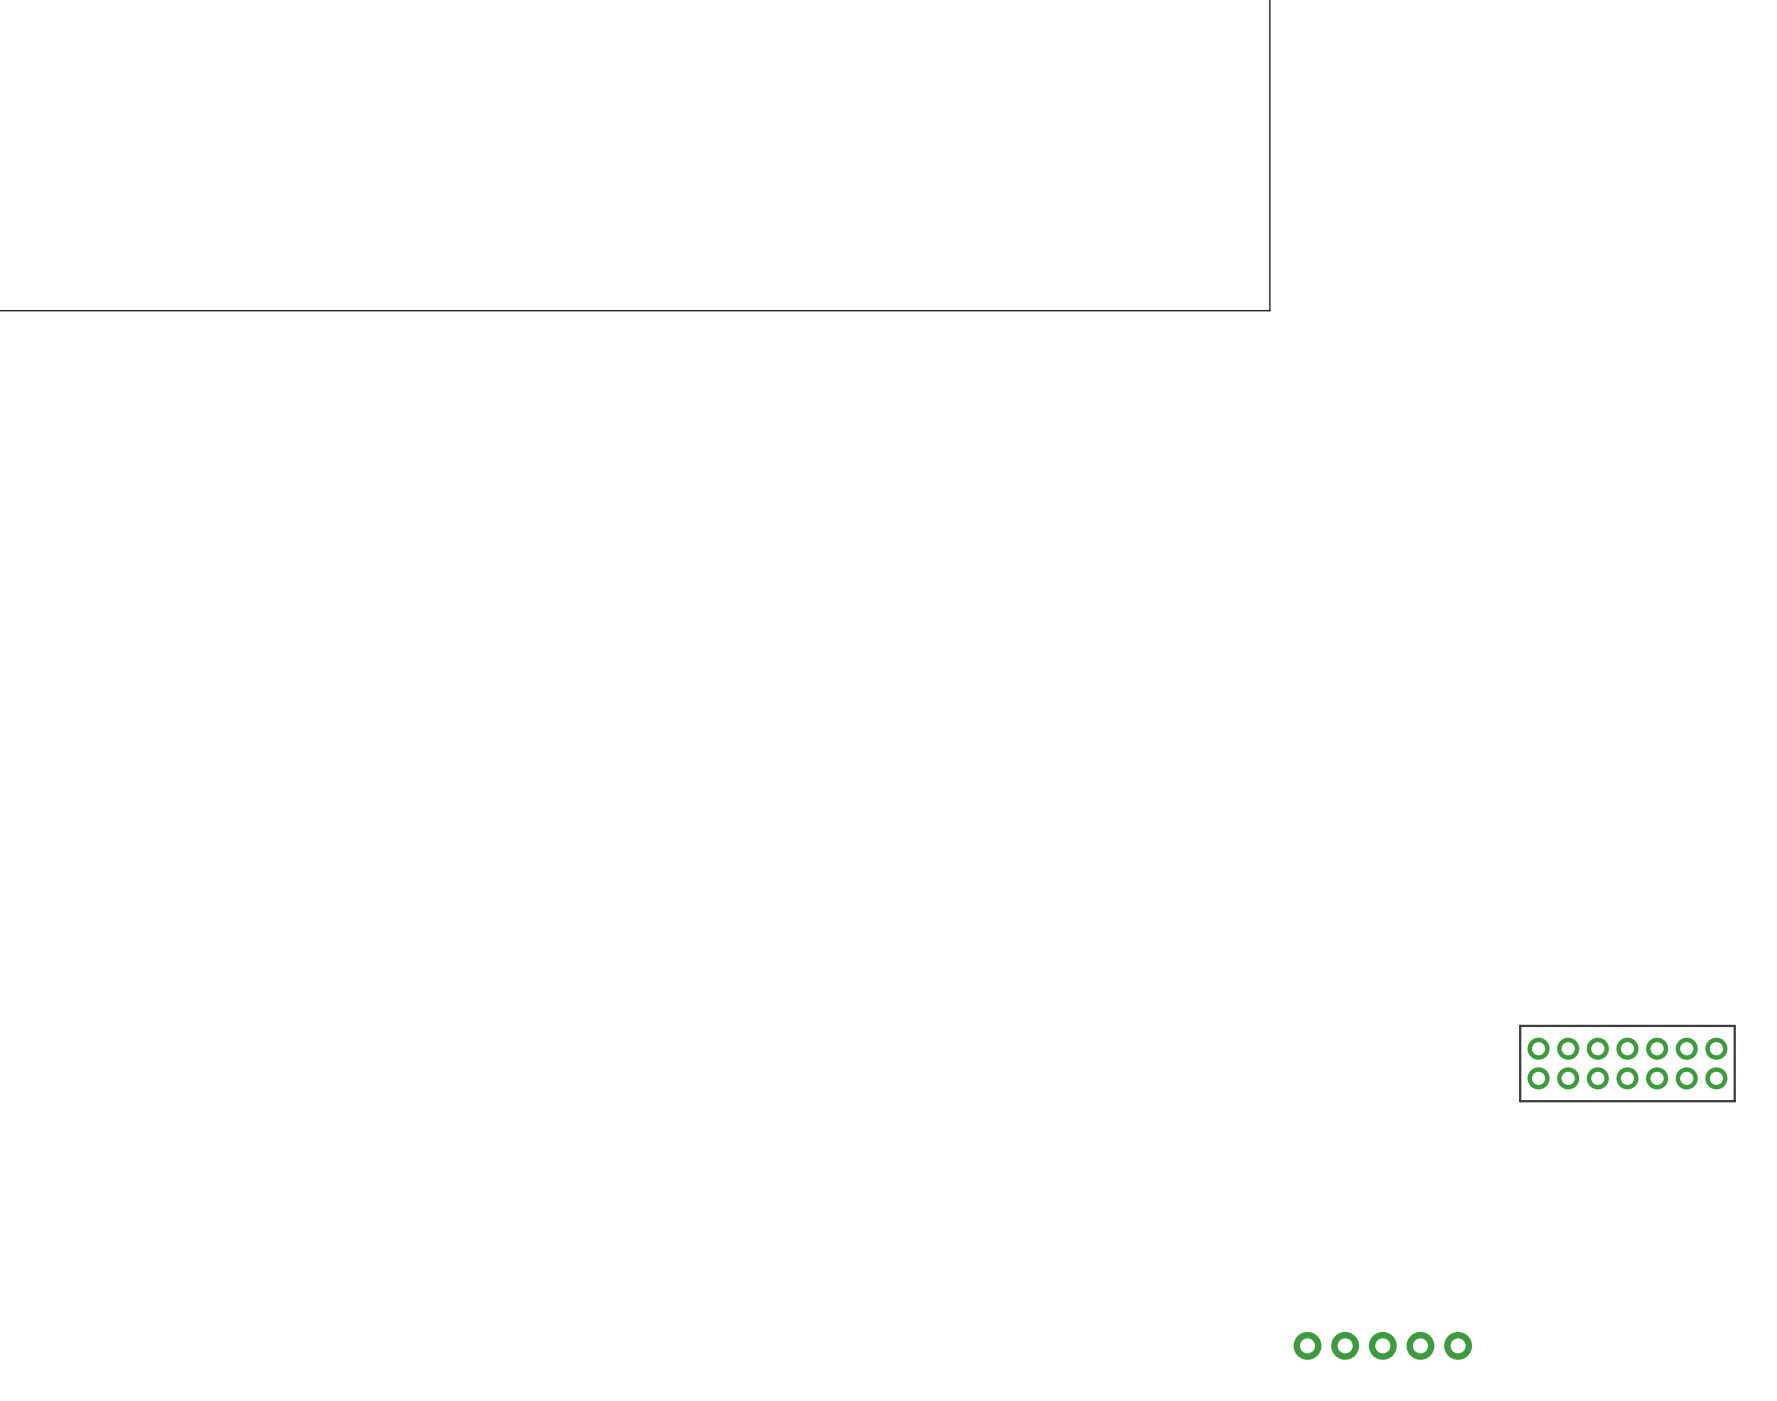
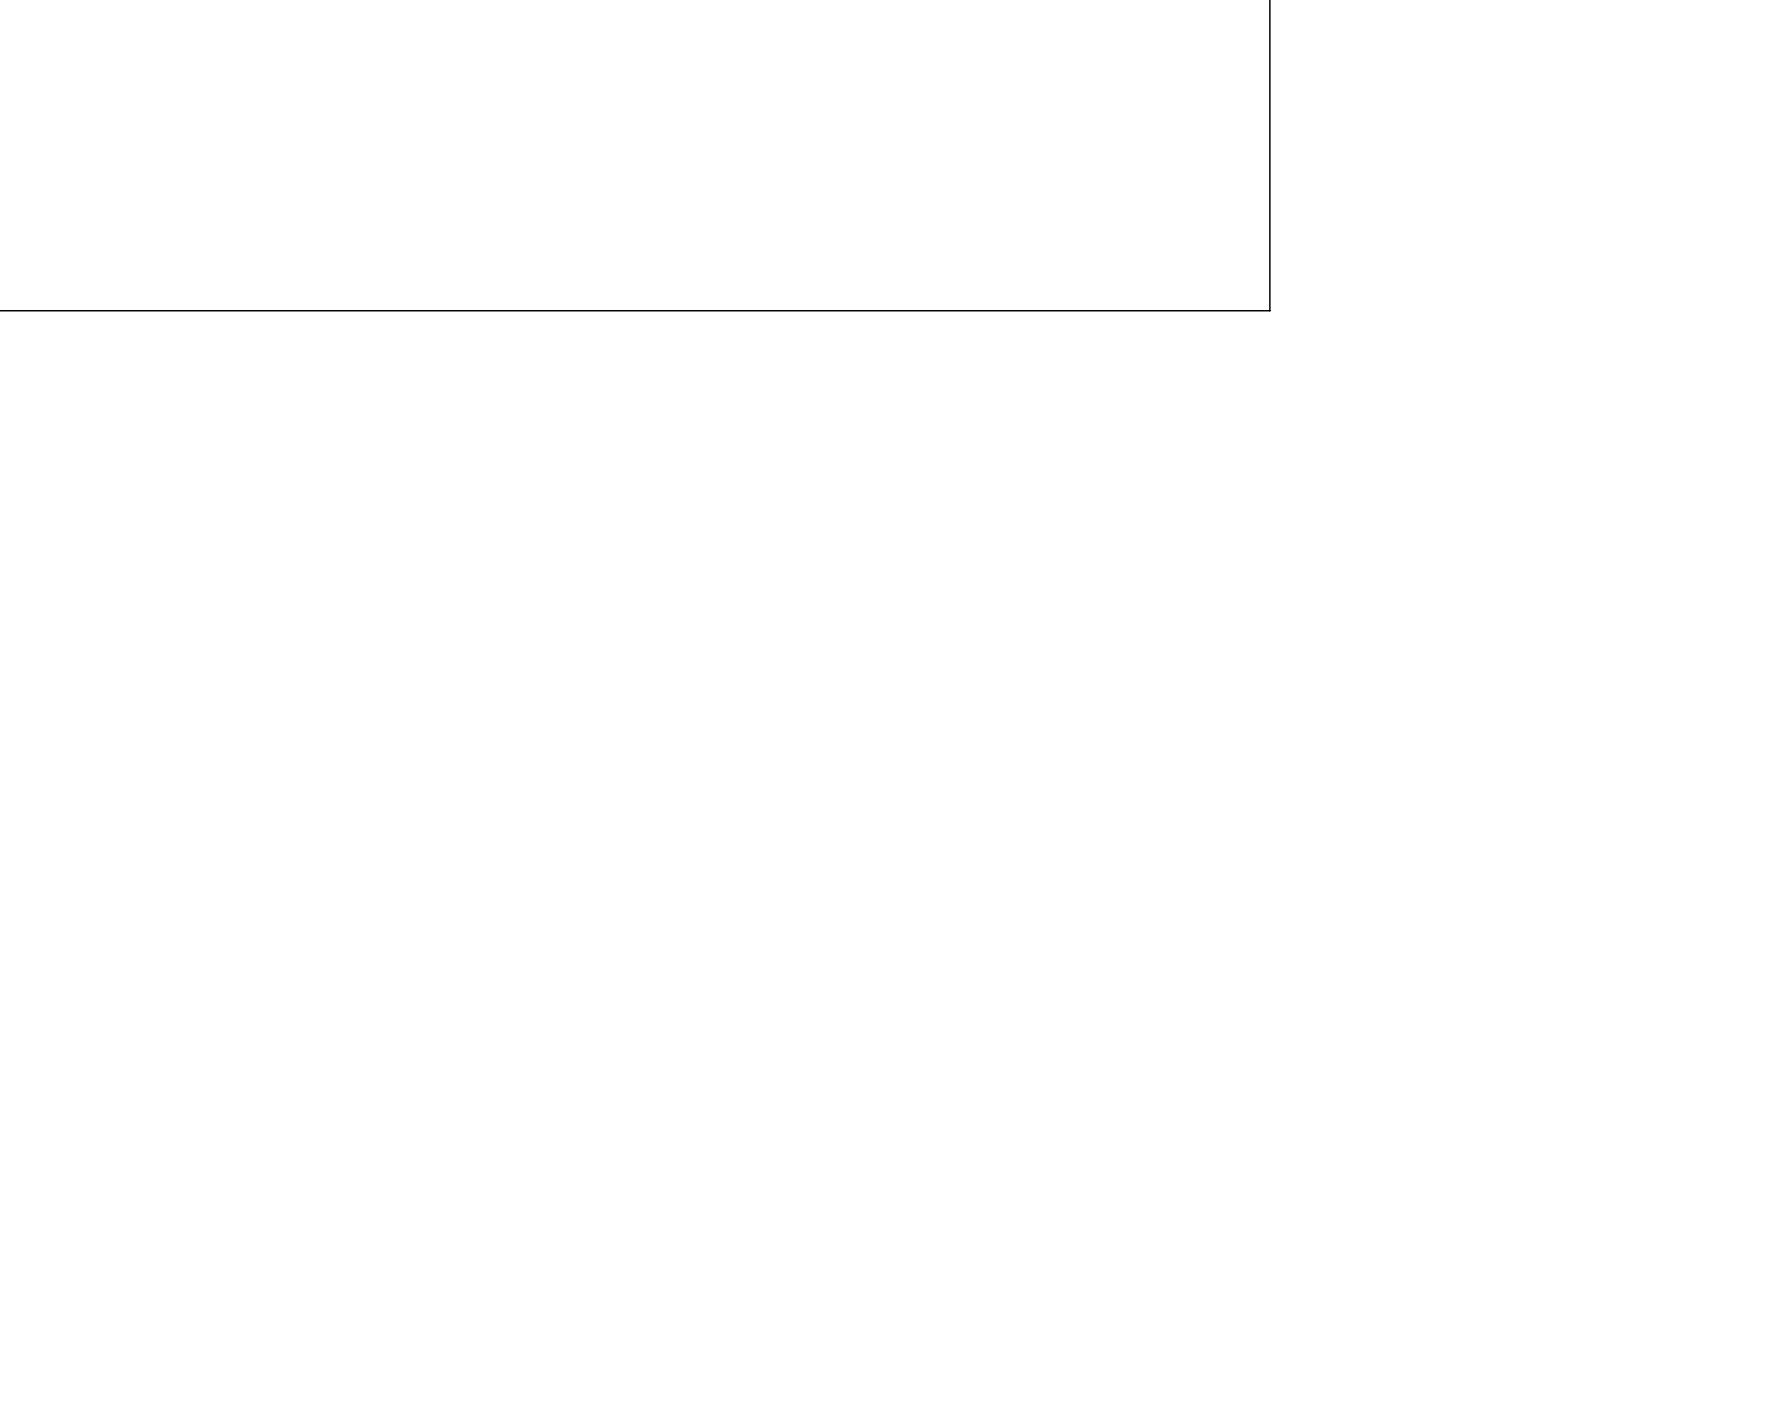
part: (1627, 1063) -> none
part: (1382, 1345) -> none

